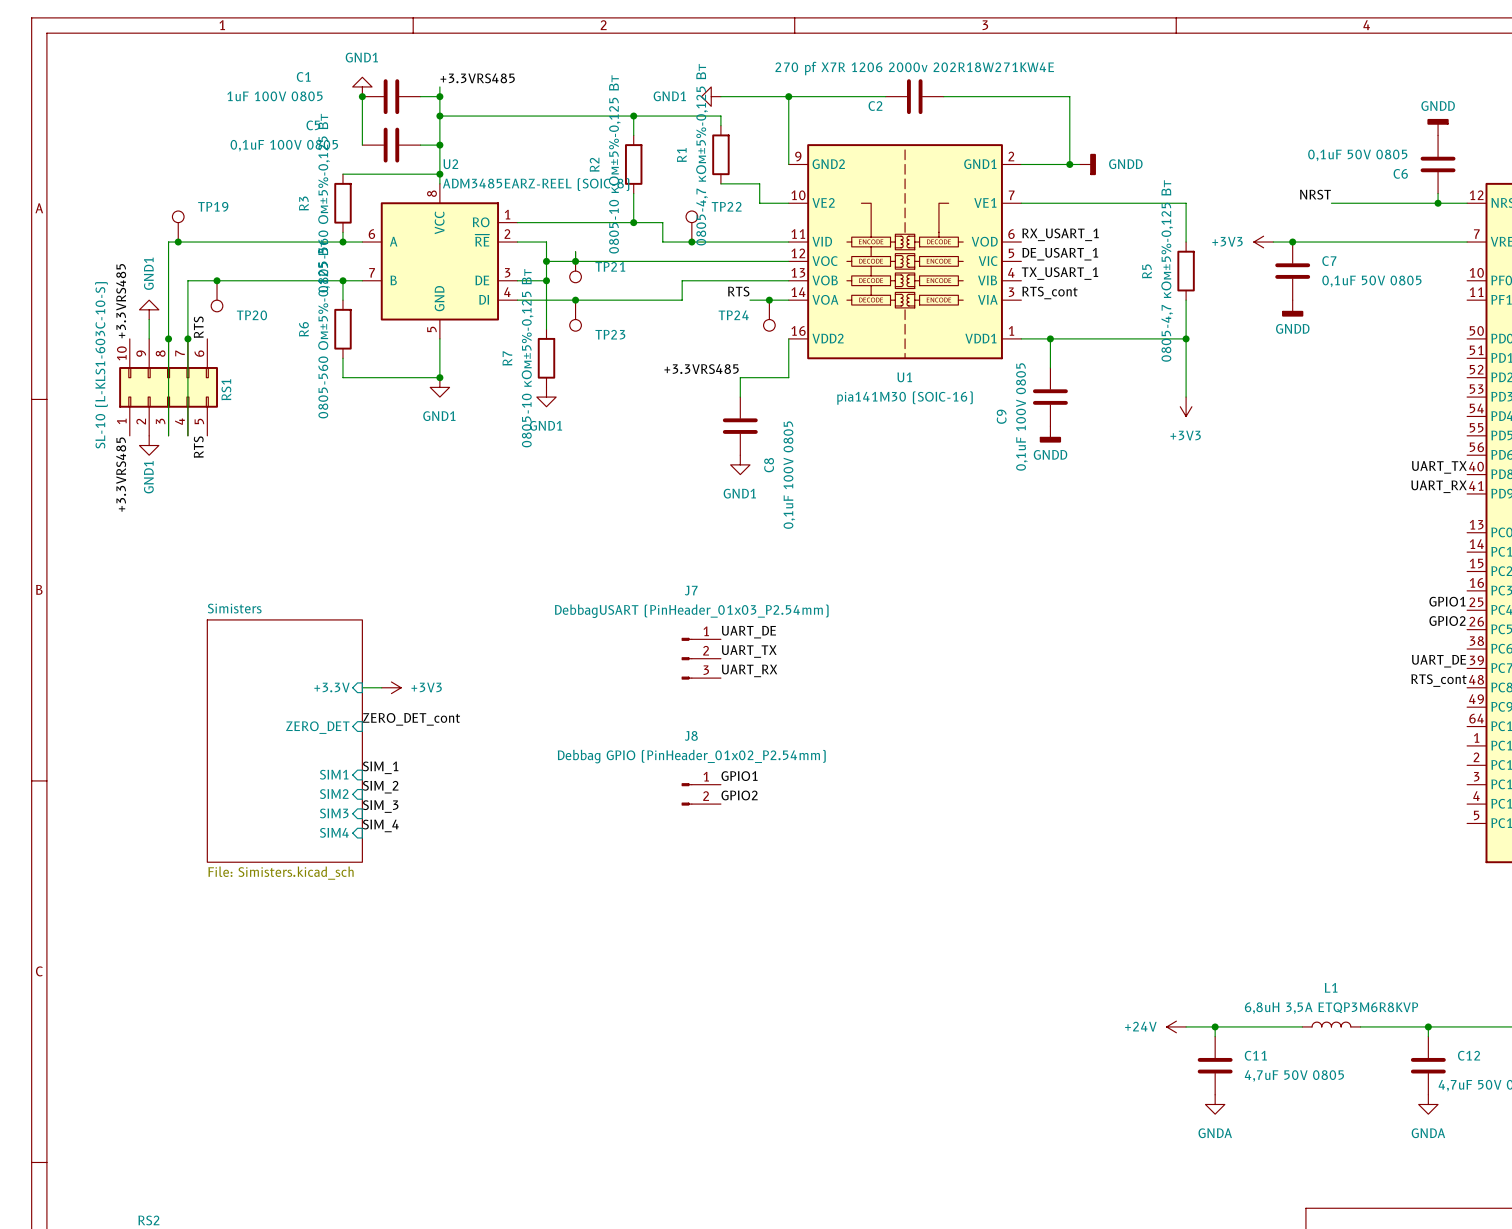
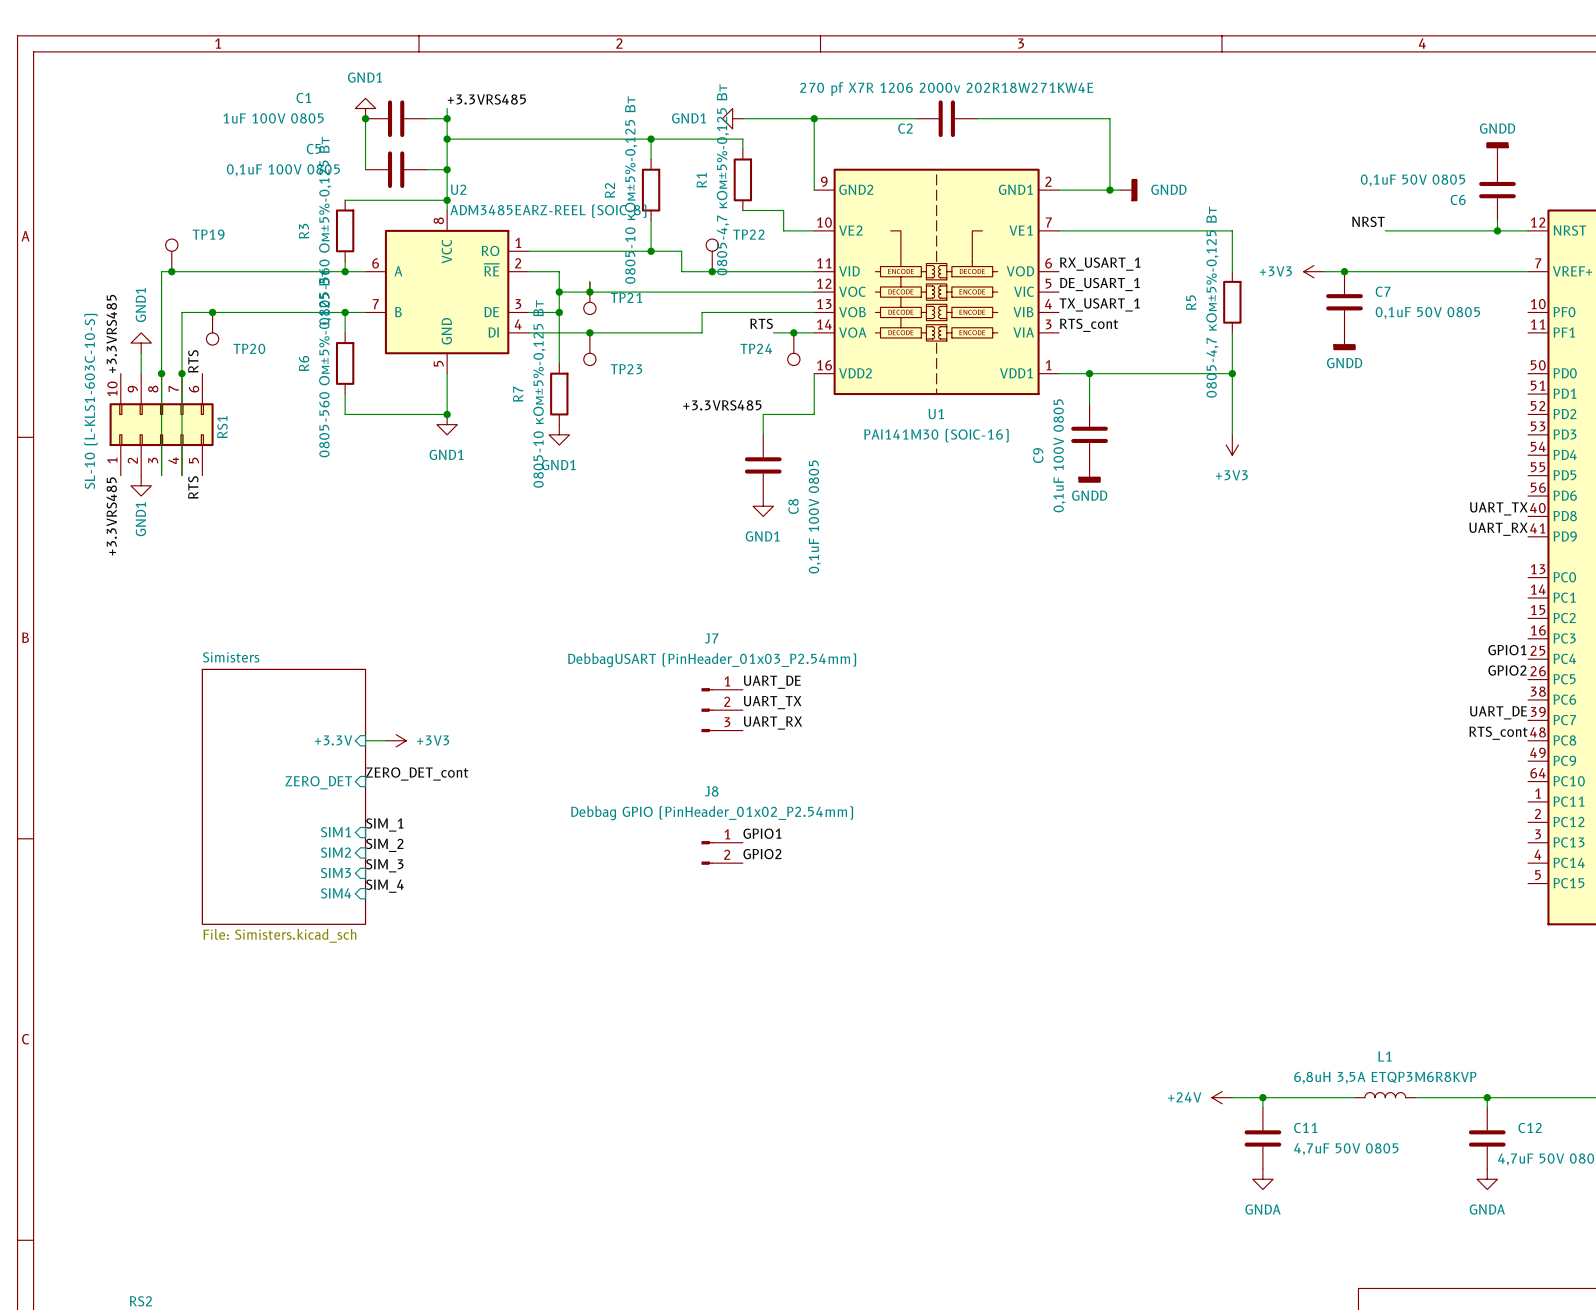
U1 value: pia141M30 (SOIC-16) (905, 398) -> PAI141M30 (SOIC-16) (936, 435)

